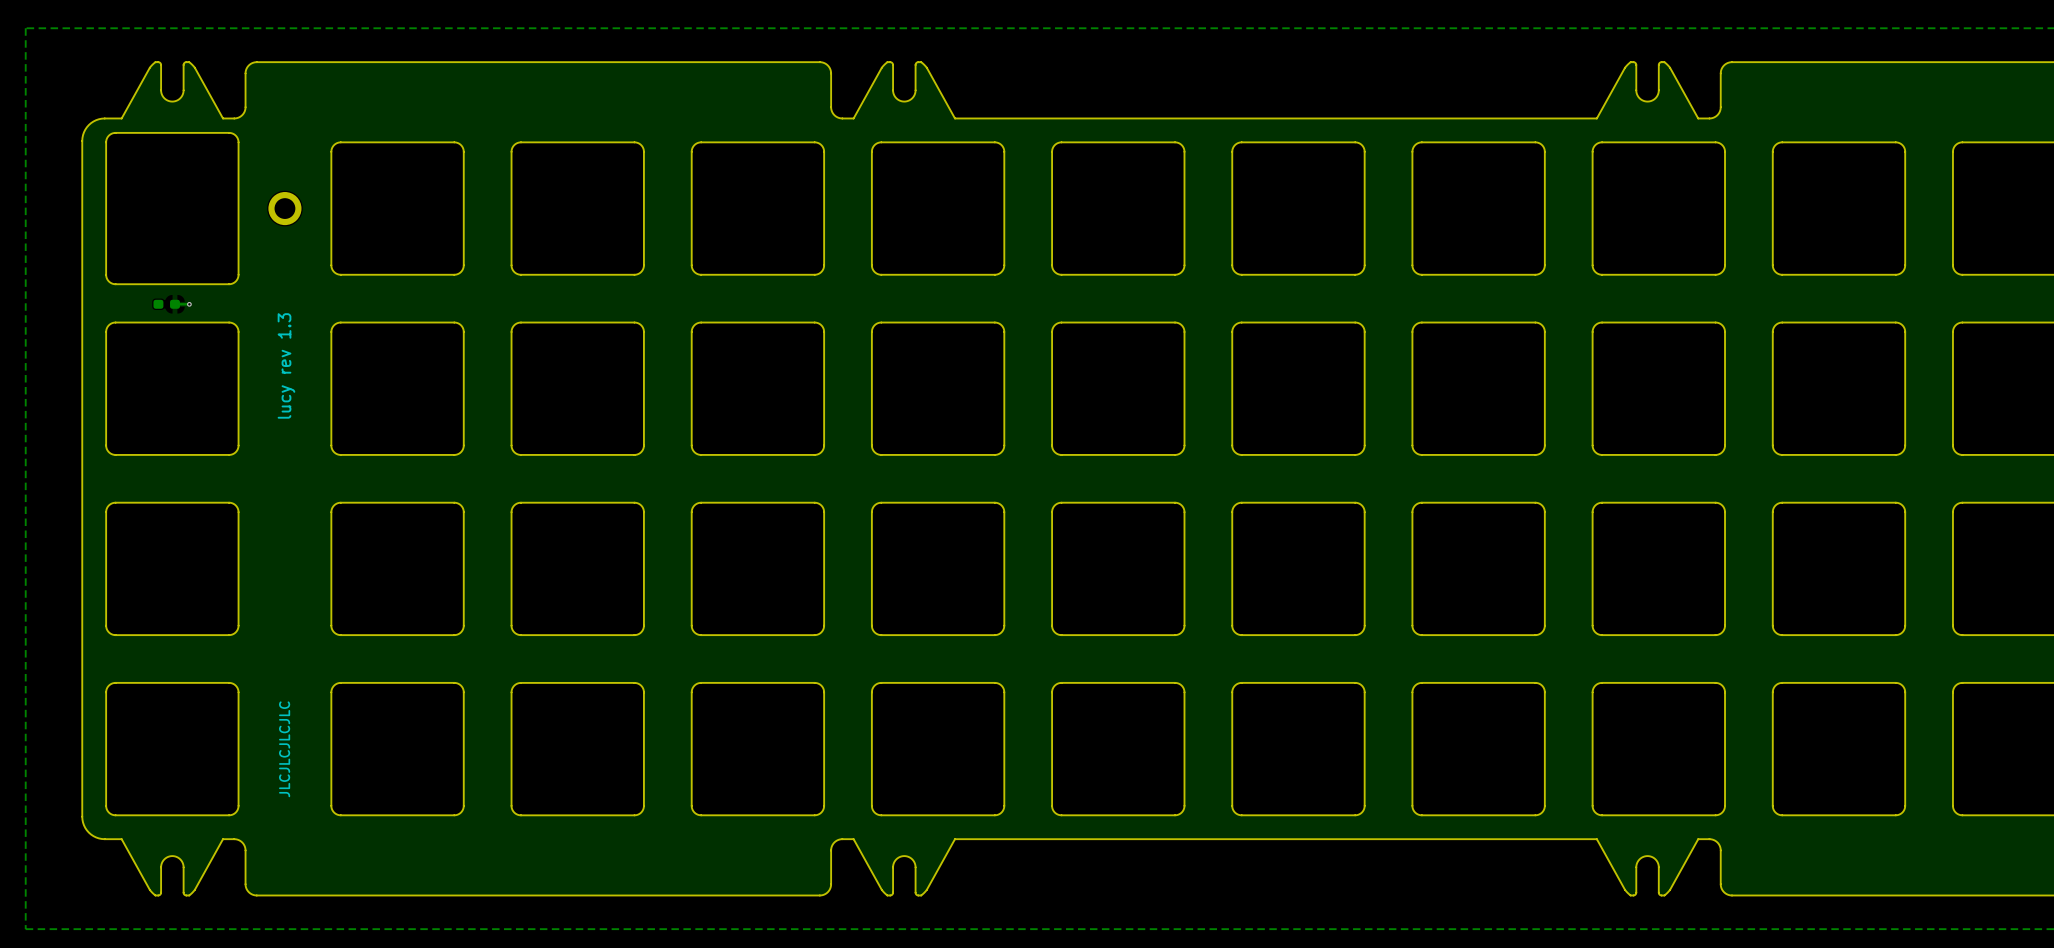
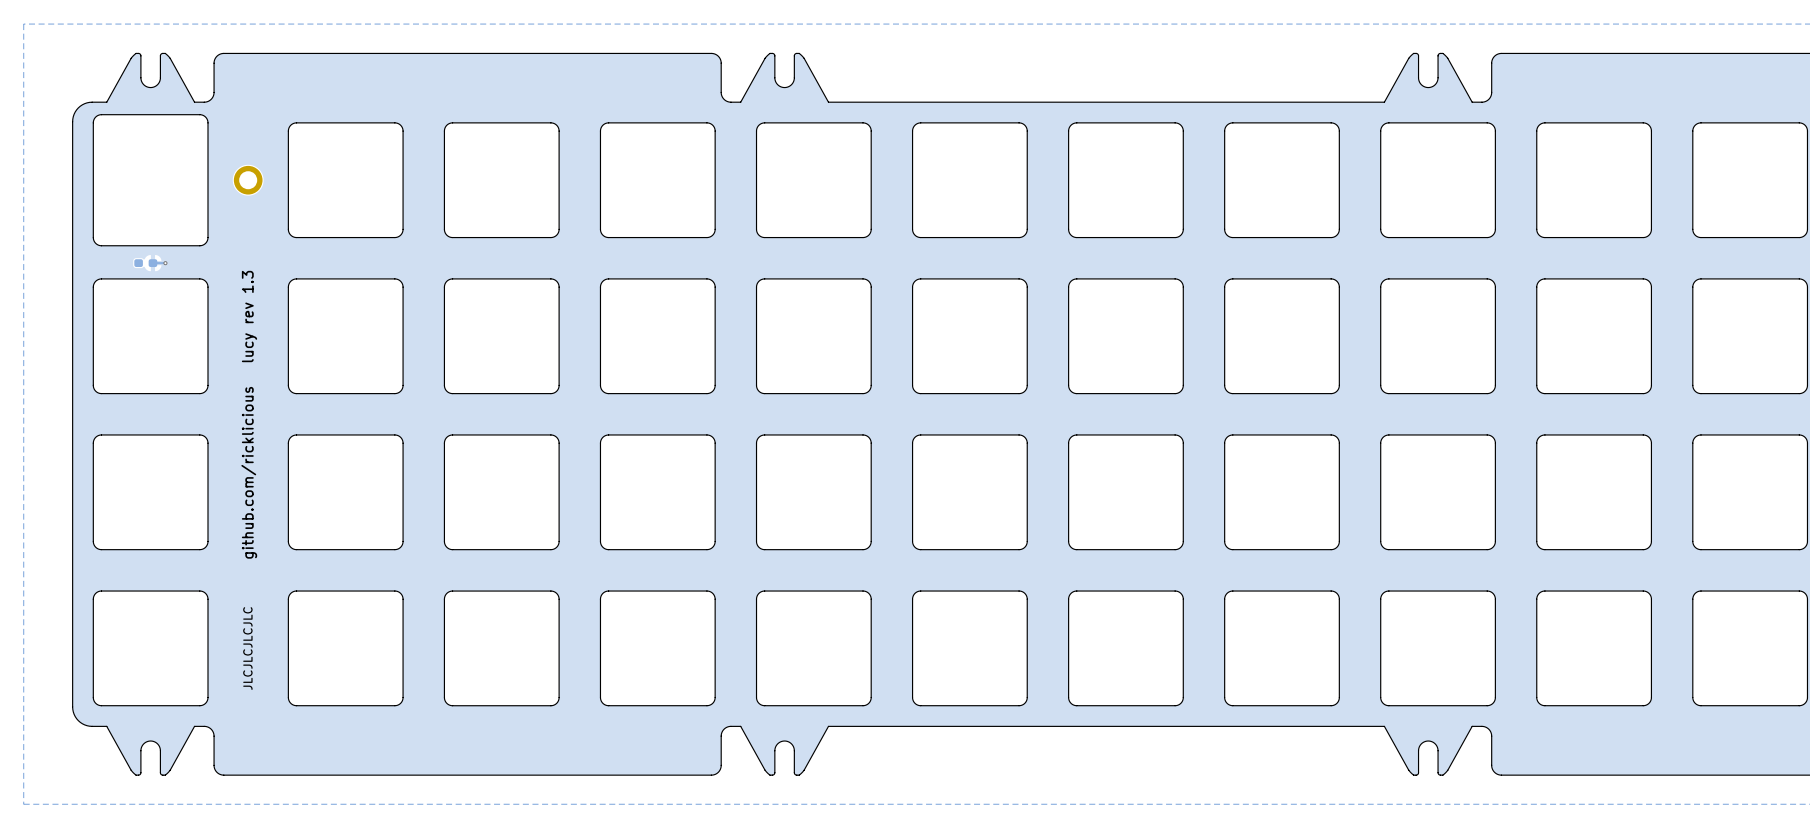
text: none -> github.com/ricklicious (249, 472)

